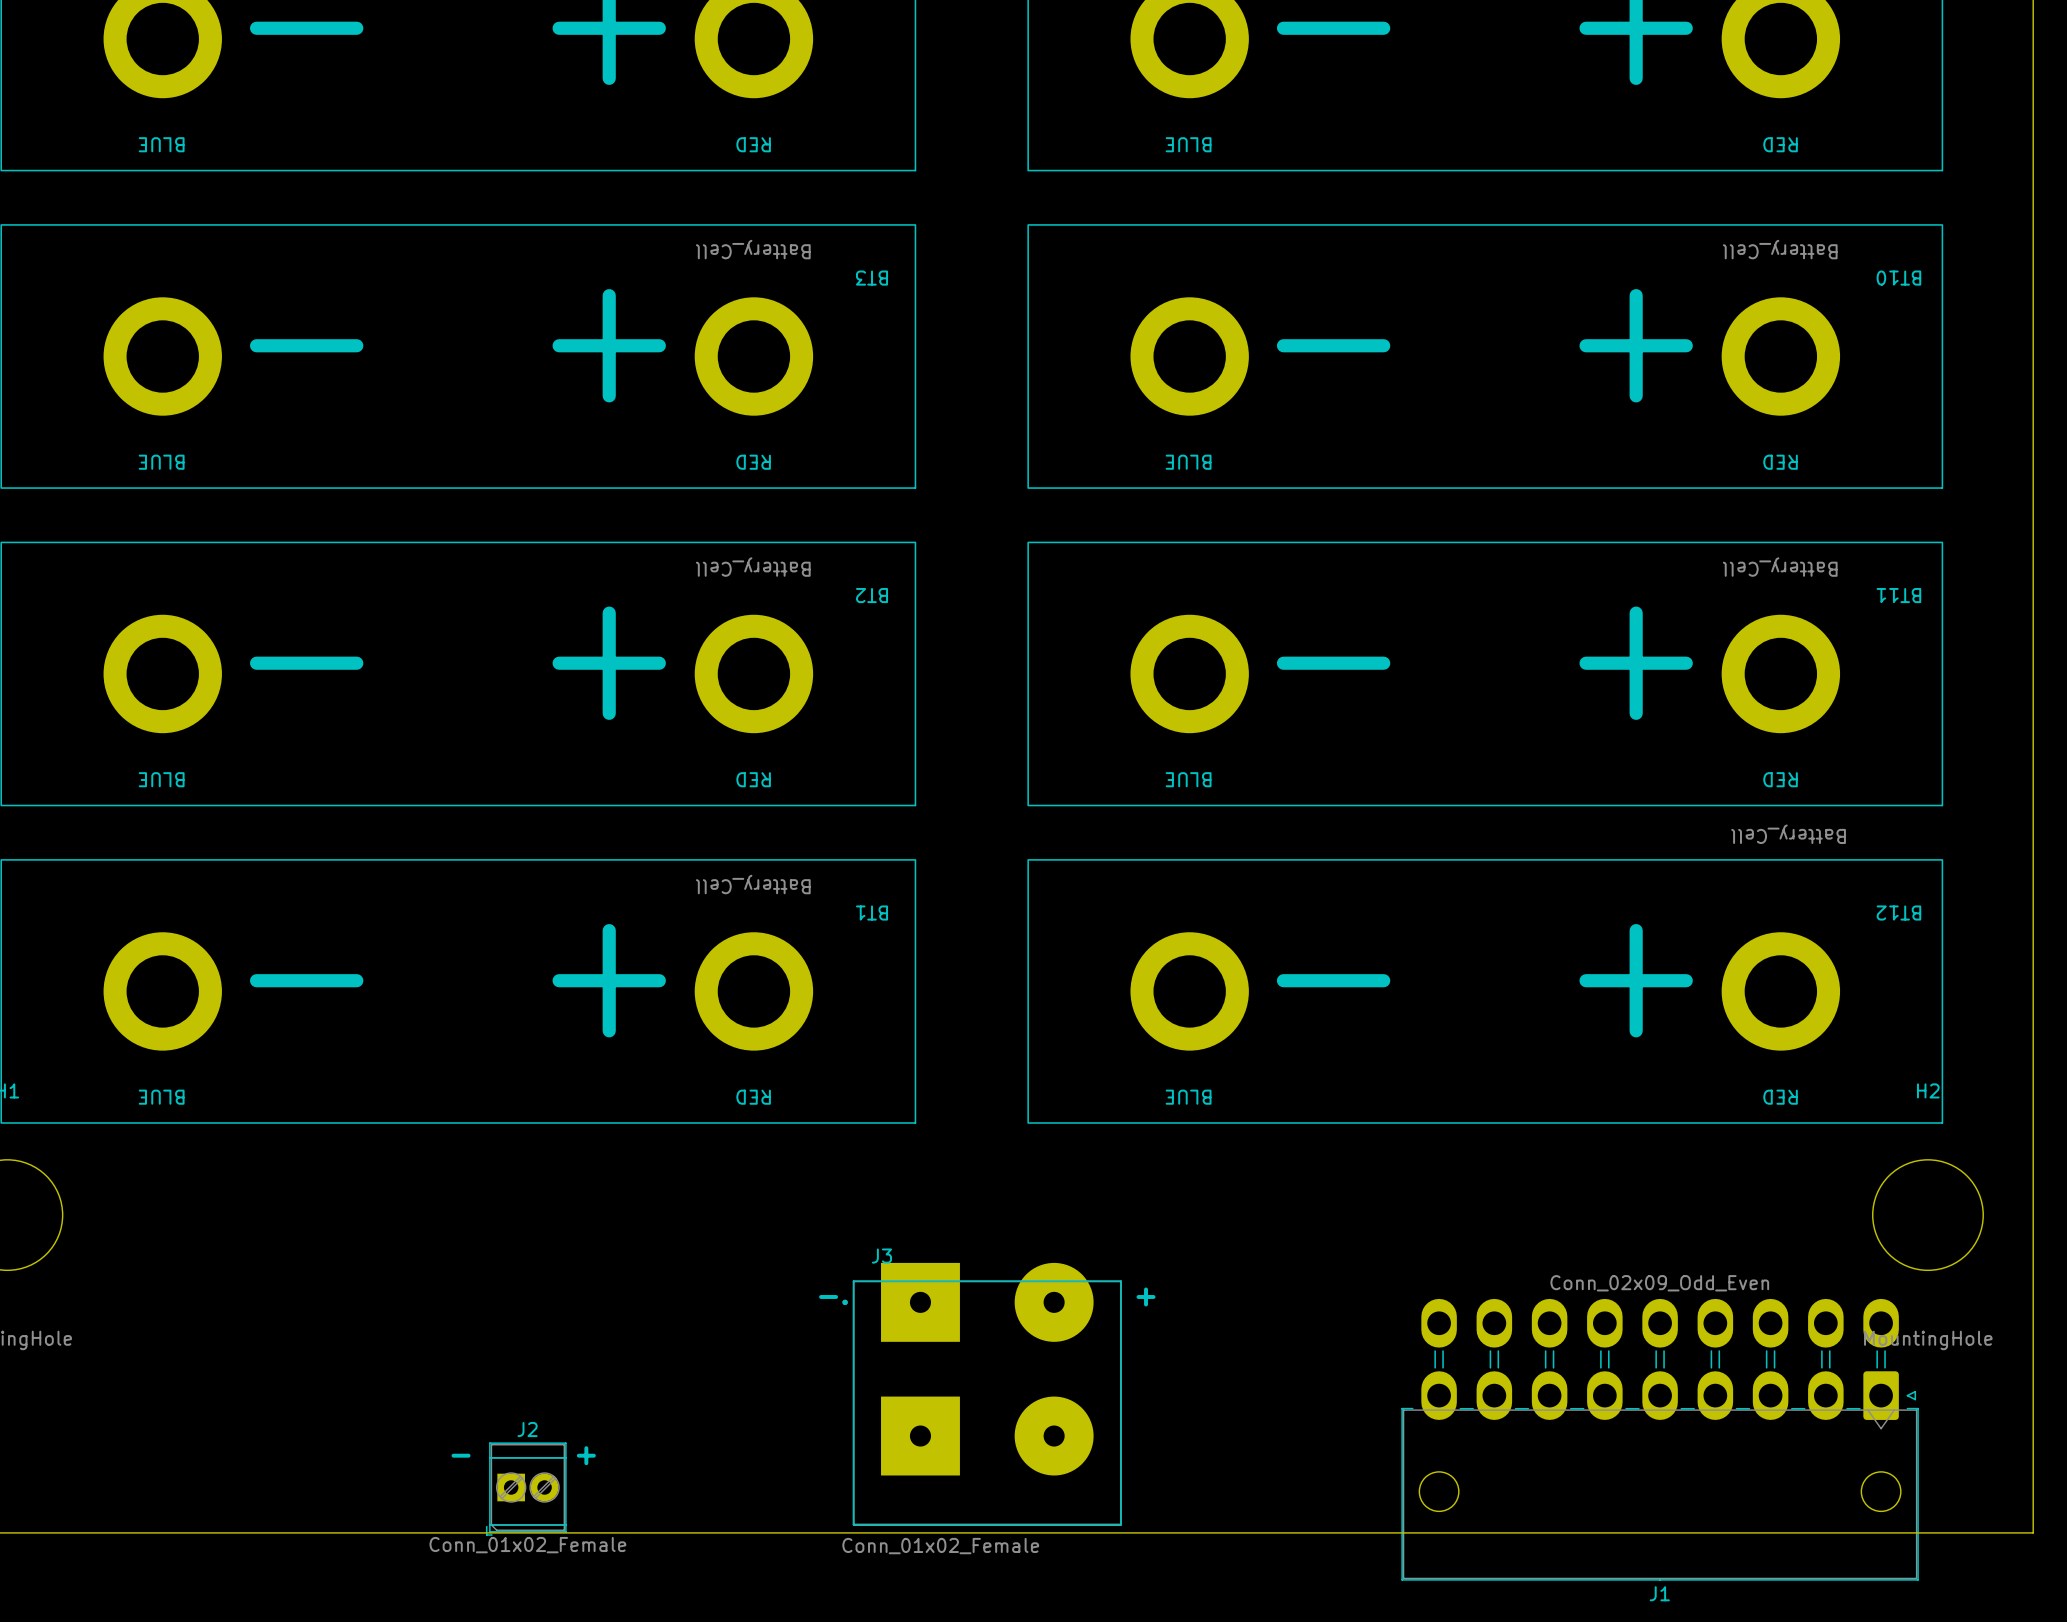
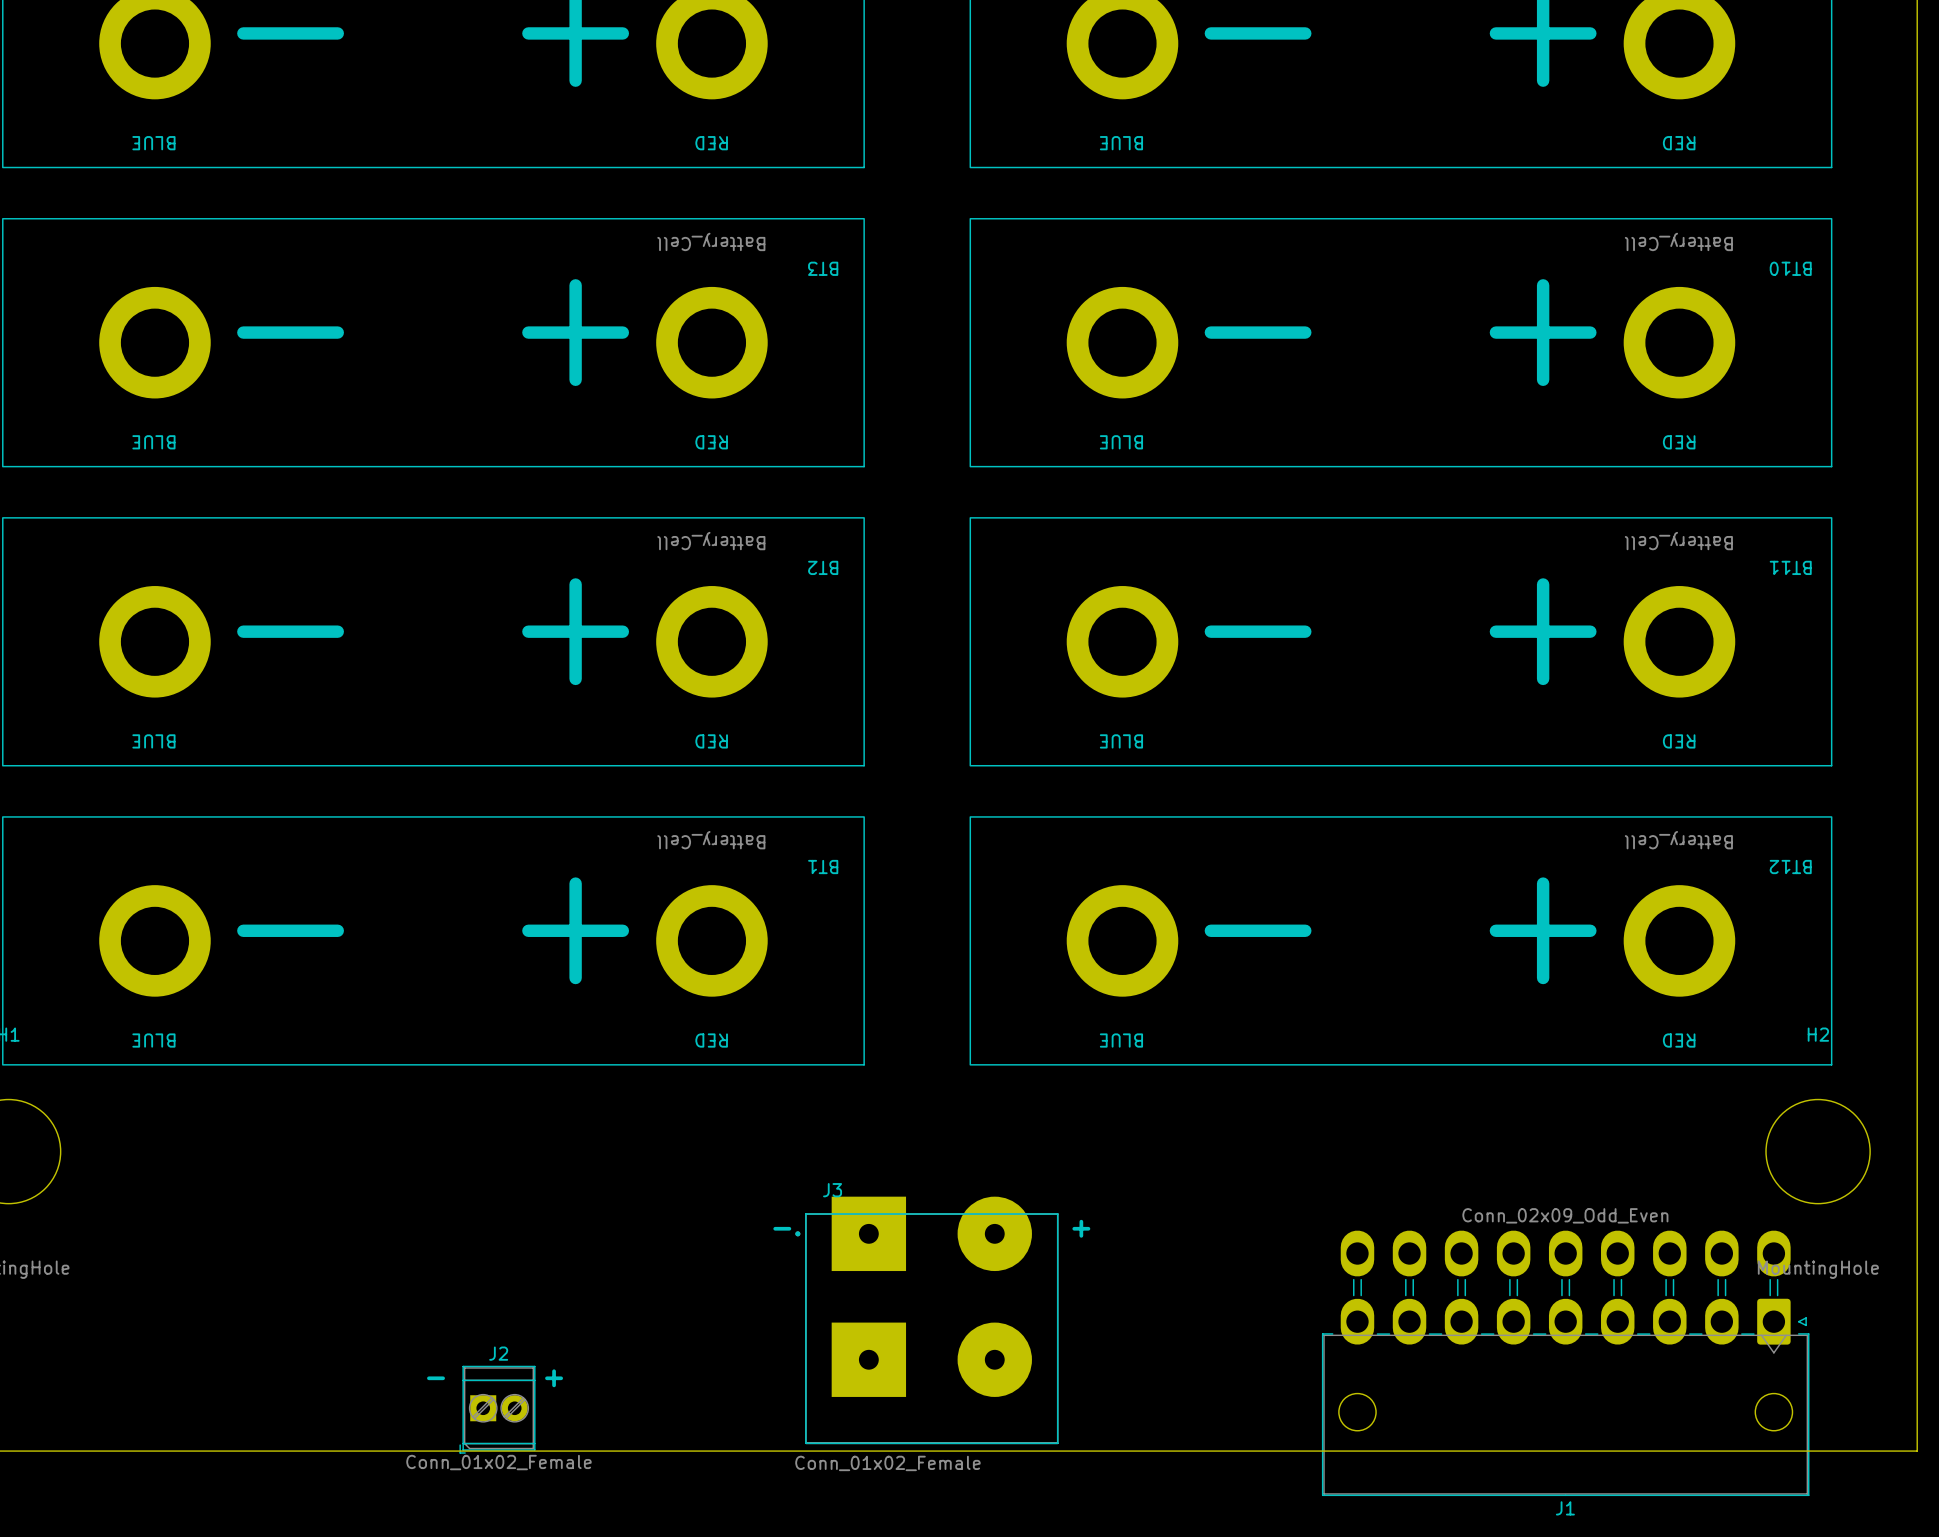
BT12 value position: Battery_Cell (1788, 834) -> Battery_Cell (1678, 840)

